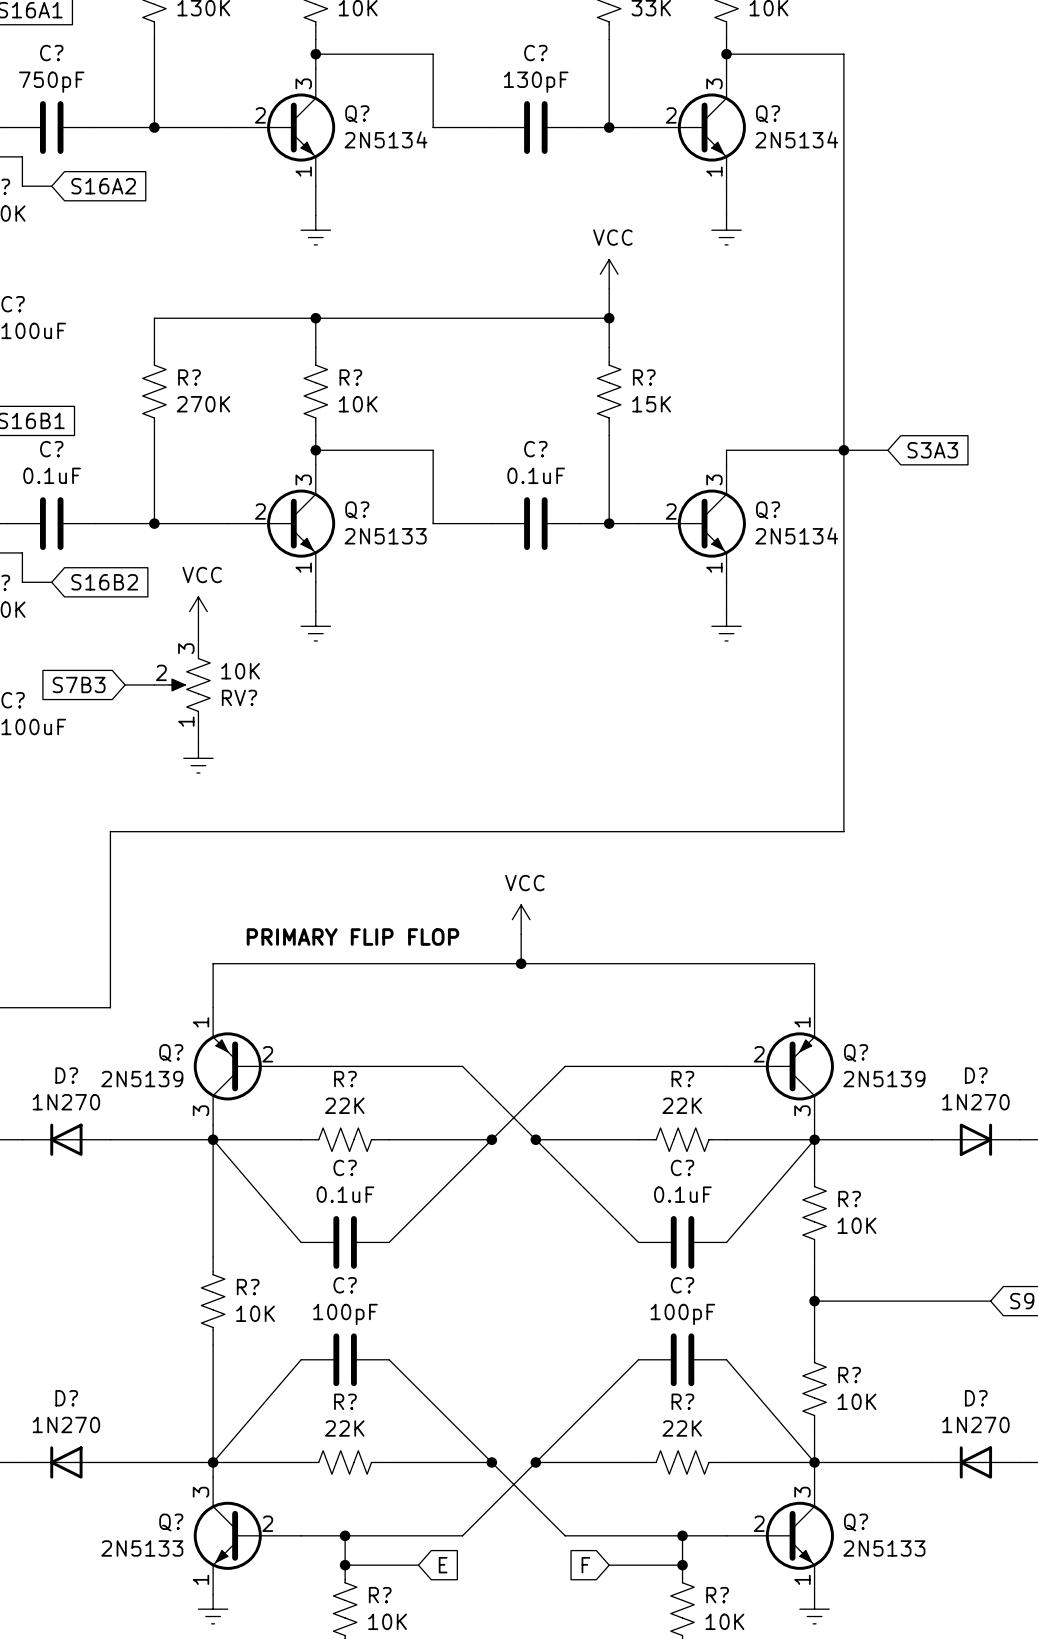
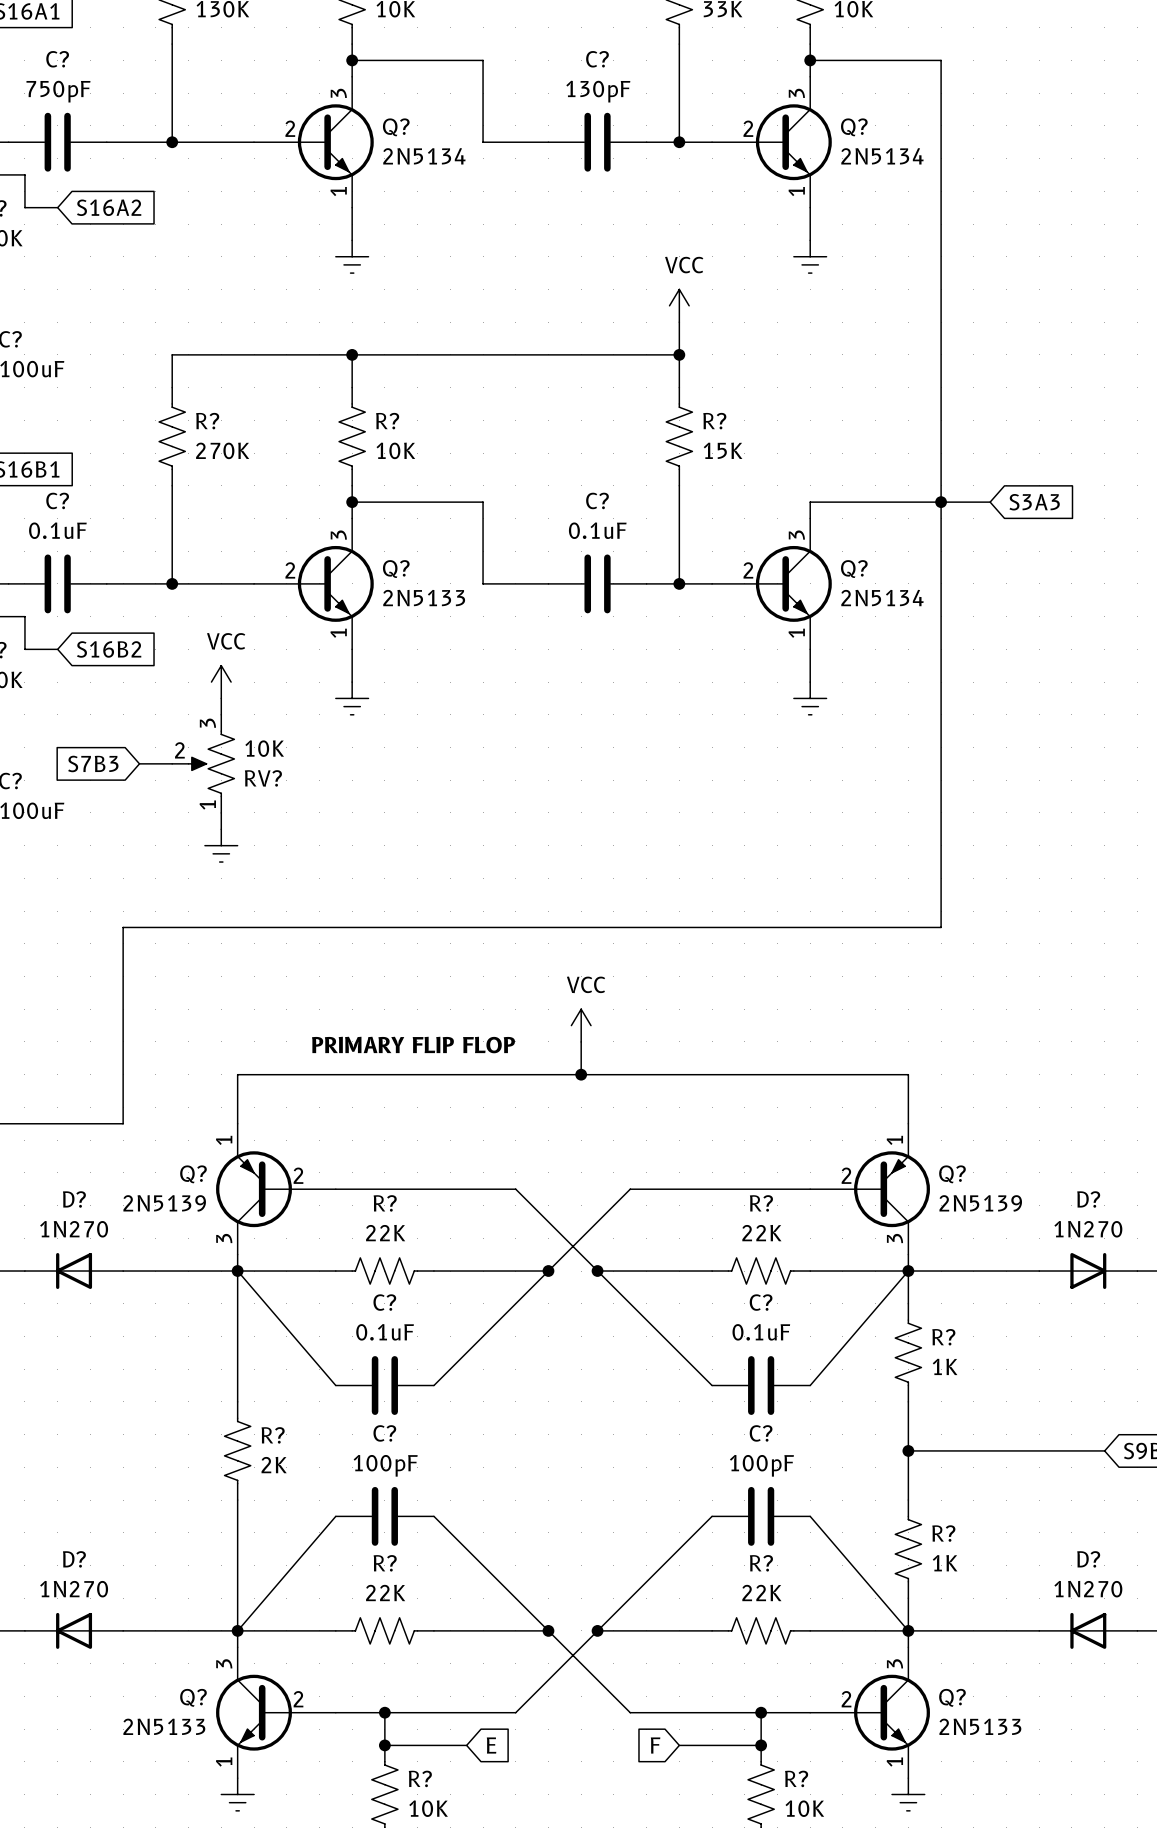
R? value: 10K (856, 1225) -> 1K (945, 1366)
R? value: 10K (255, 1313) -> 2K (274, 1465)
R? value: 10K (856, 1401) -> 1K (945, 1563)

